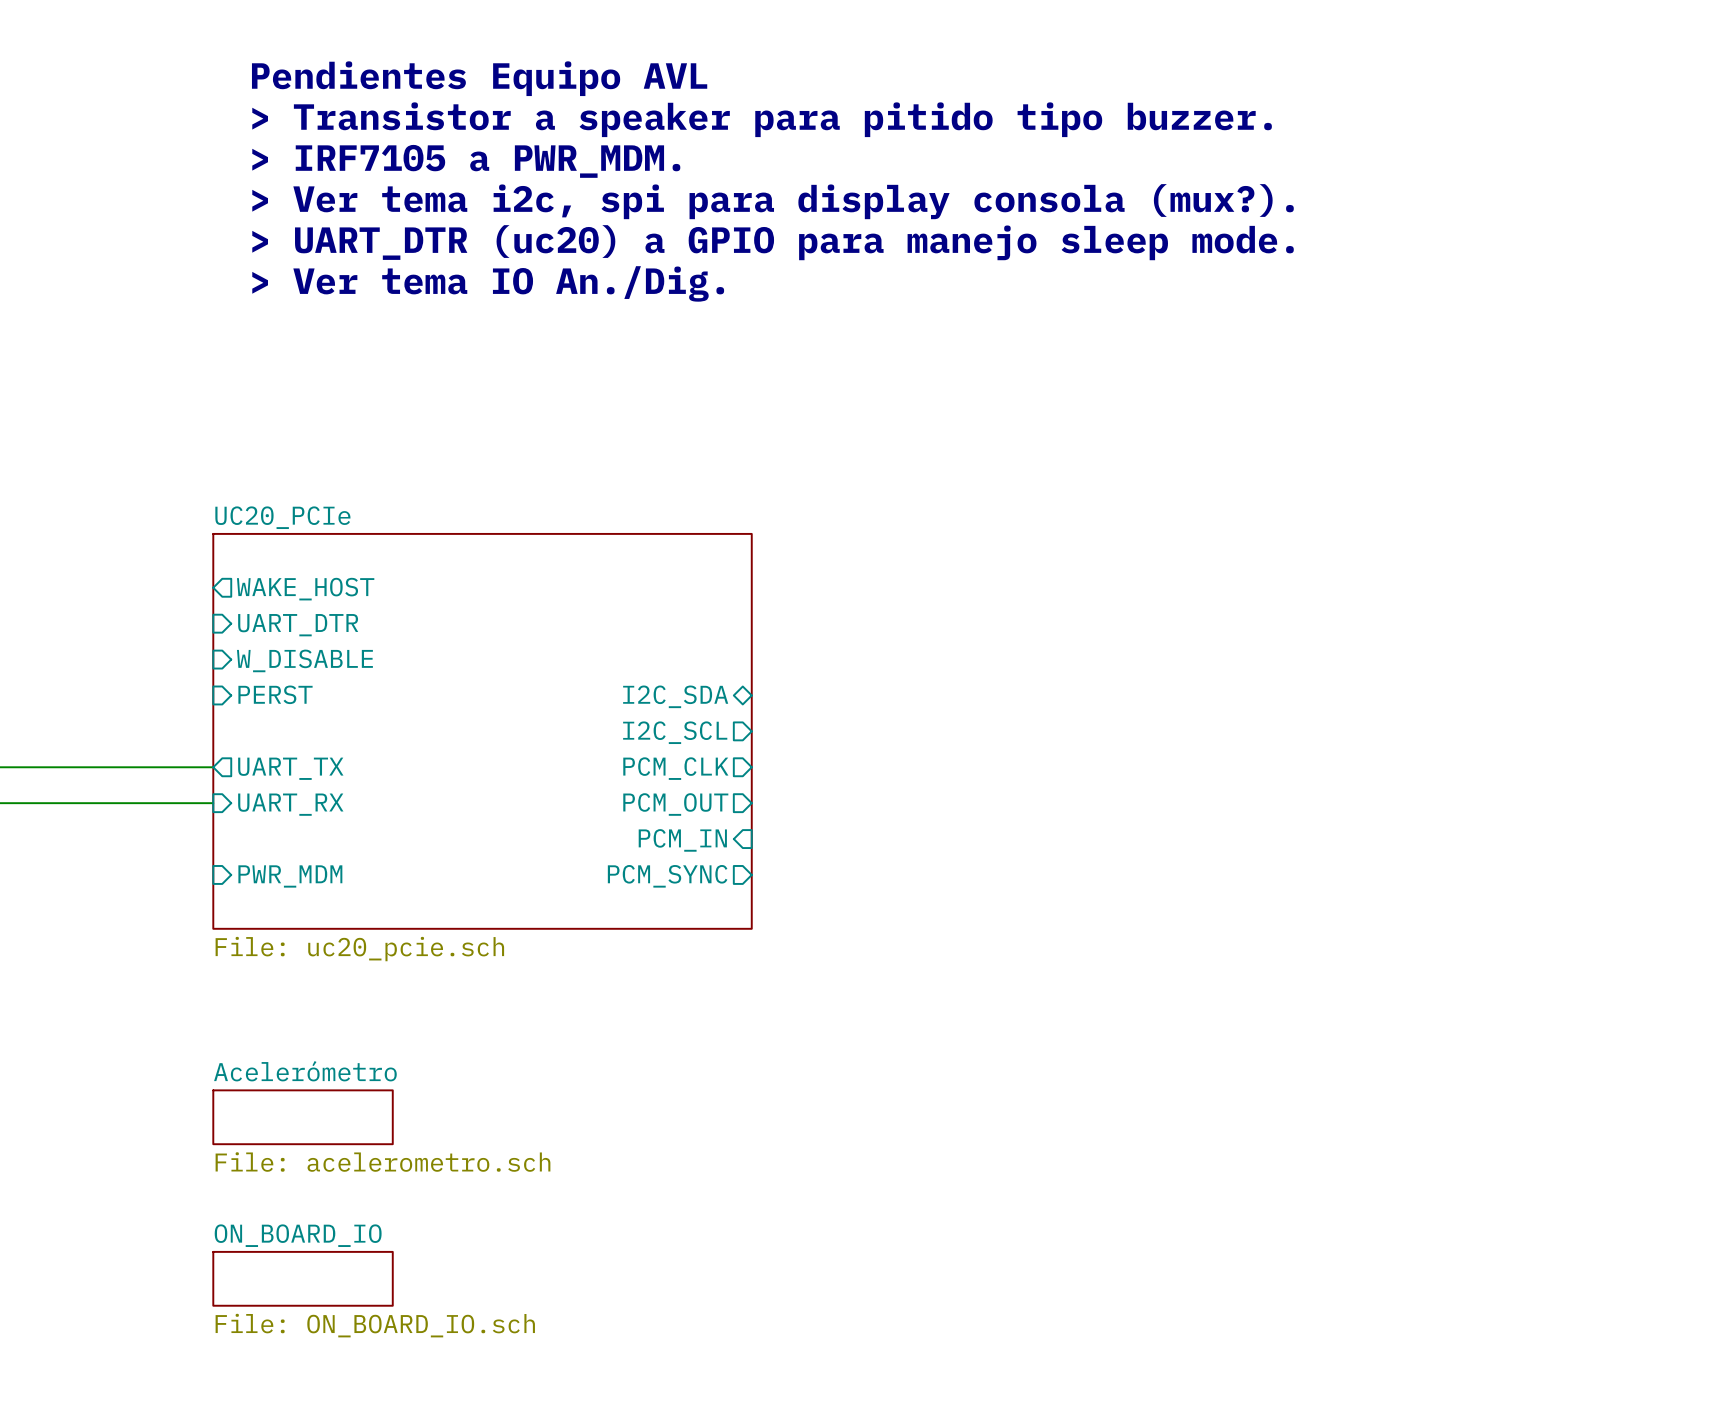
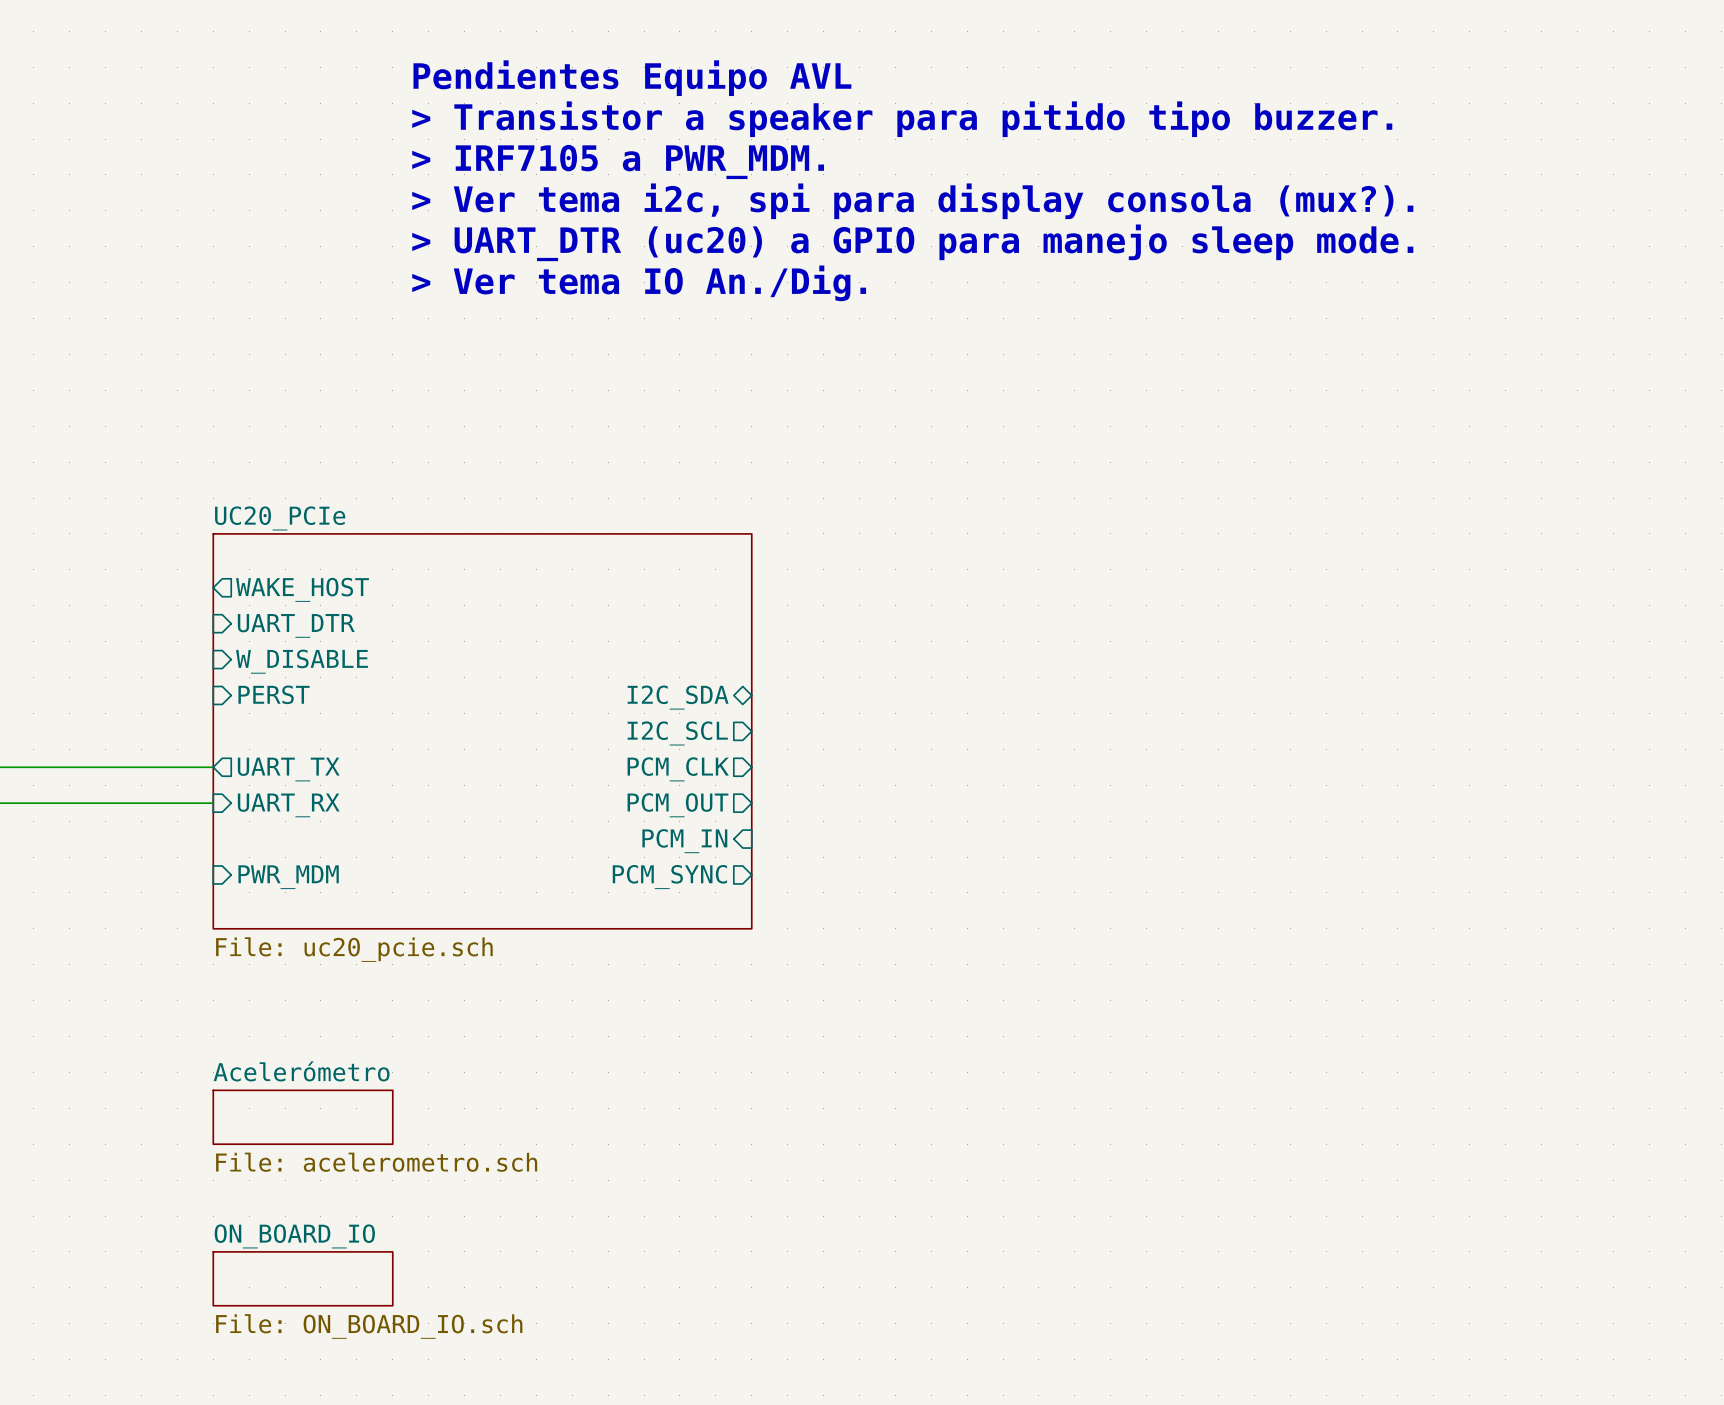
text position: Pendientes Equipo AVL (479, 78) -> Pendientes Equipo AVL (632, 78)
text position: > Transistor a speaker para pitido tipo buzzer. (762, 119) -> > Transistor a speaker para pitido tipo buzzer. (902, 119)
text position: > IRF7105 a PWR_MDM. (466, 161) -> > IRF7105 a PWR_MDM. (618, 161)
text position: > Ver tema i2c, spi para display consola (mux?). (773, 201) -> > Ver tema i2c, spi para display consola (mux?). (912, 201)
text position: > UART_DTR (uc20) a GPIO para manejo sleep mode. (773, 242) -> > UART_DTR (uc20) a GPIO para manejo sleep mode. (912, 242)
text position: > Ver tema IO An./Dig. (488, 283) -> > Ver tema IO An./Dig. (639, 283)

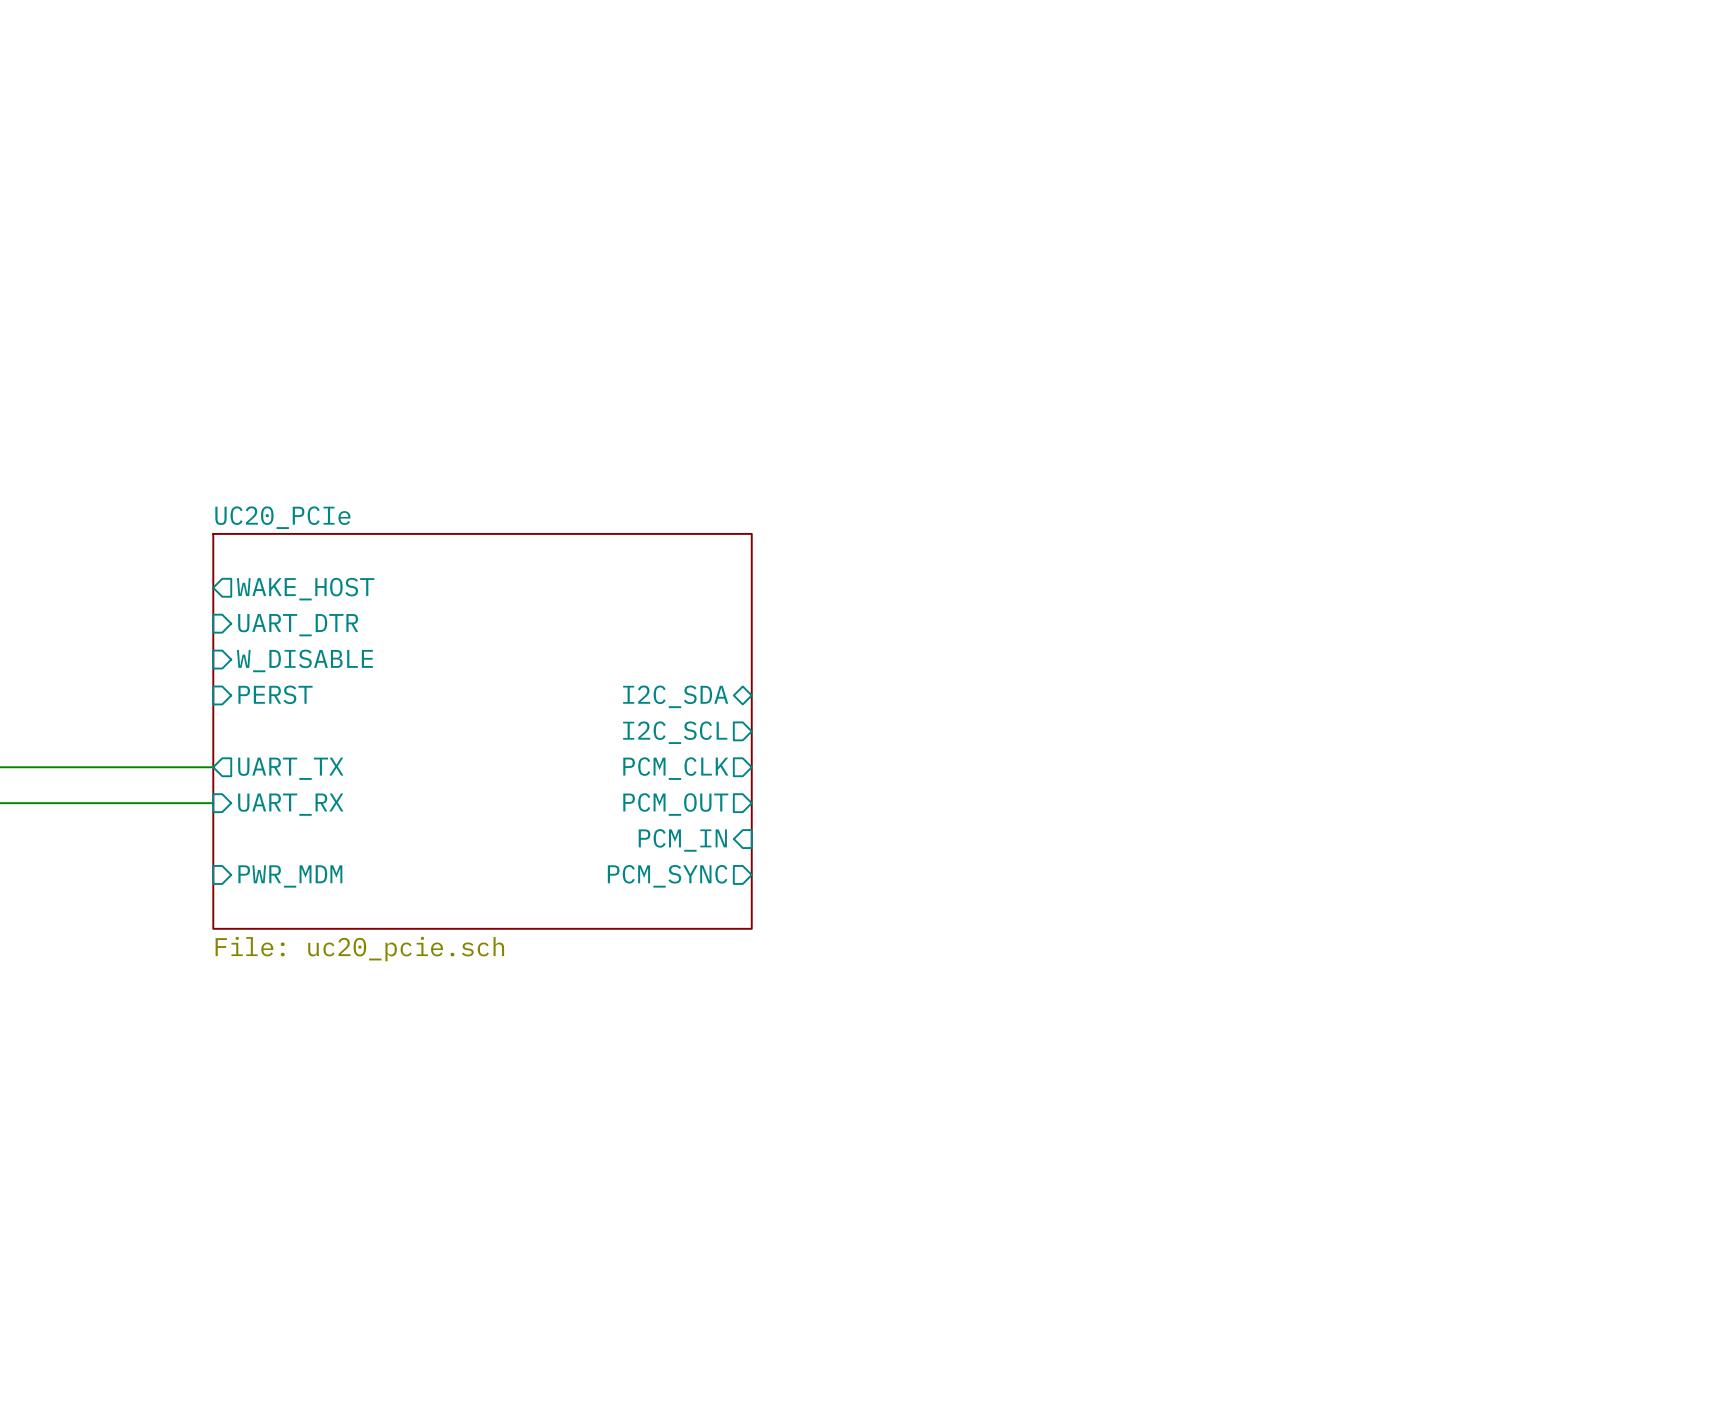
text: Pendientes Equipo AVL (632, 78) -> none
text: > Transistor a speaker para pitido tipo buzzer. (902, 119) -> none
text: > IRF7105 a PWR_MDM. (618, 161) -> none
text: > Ver tema i2c, spi para display consola (mux?). (912, 201) -> none
text: > UART_DTR (uc20) a GPIO para manejo sleep mode. (912, 242) -> none
text: > Ver tema IO An./Dig. (639, 283) -> none
sheet Acelerómetro: File: acelerometro.sch (303, 1117) -> none
sheet ON_BOARD_IO: File: ON_BOARD_IO.sch (303, 1278) -> none

